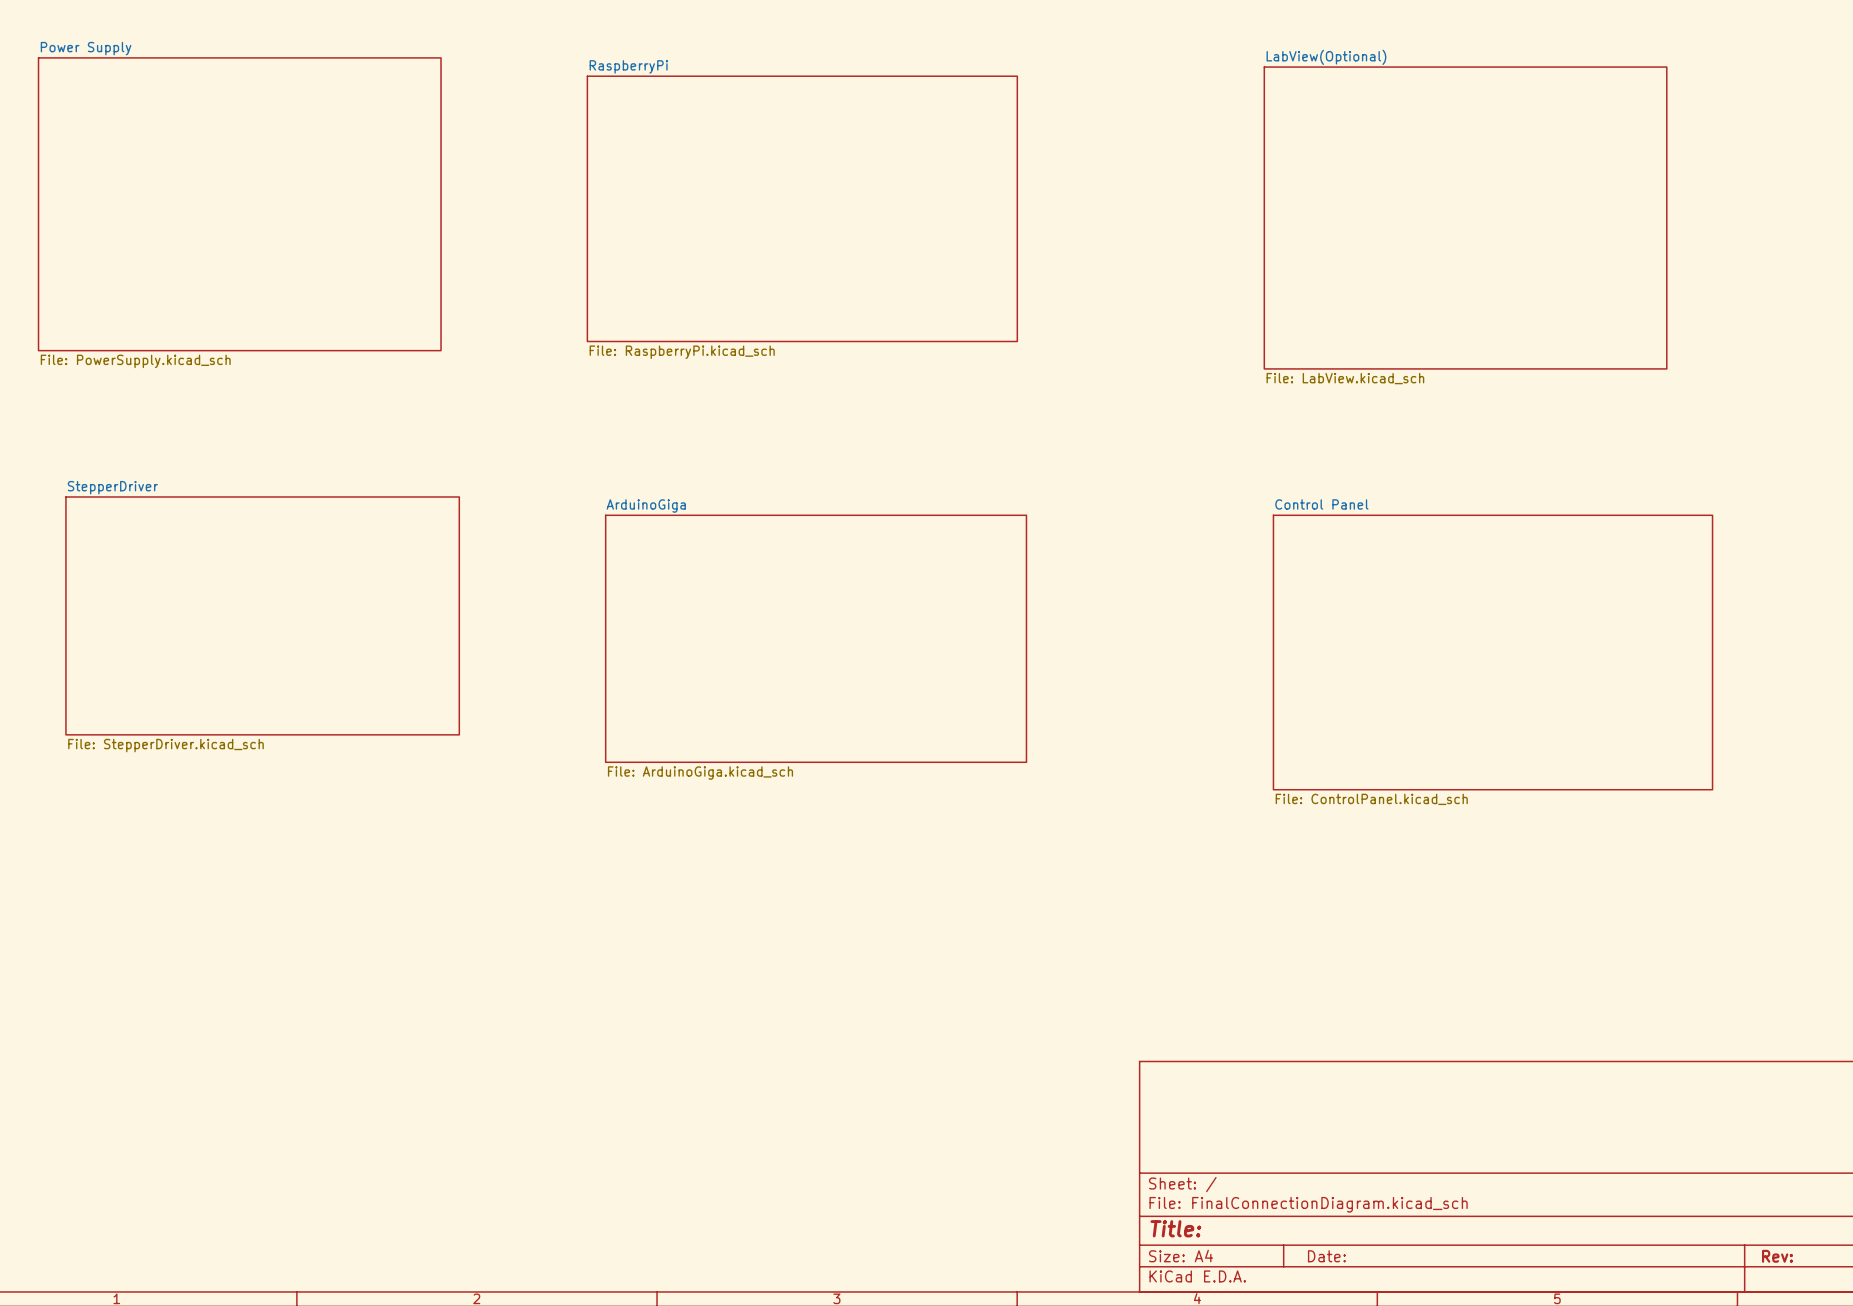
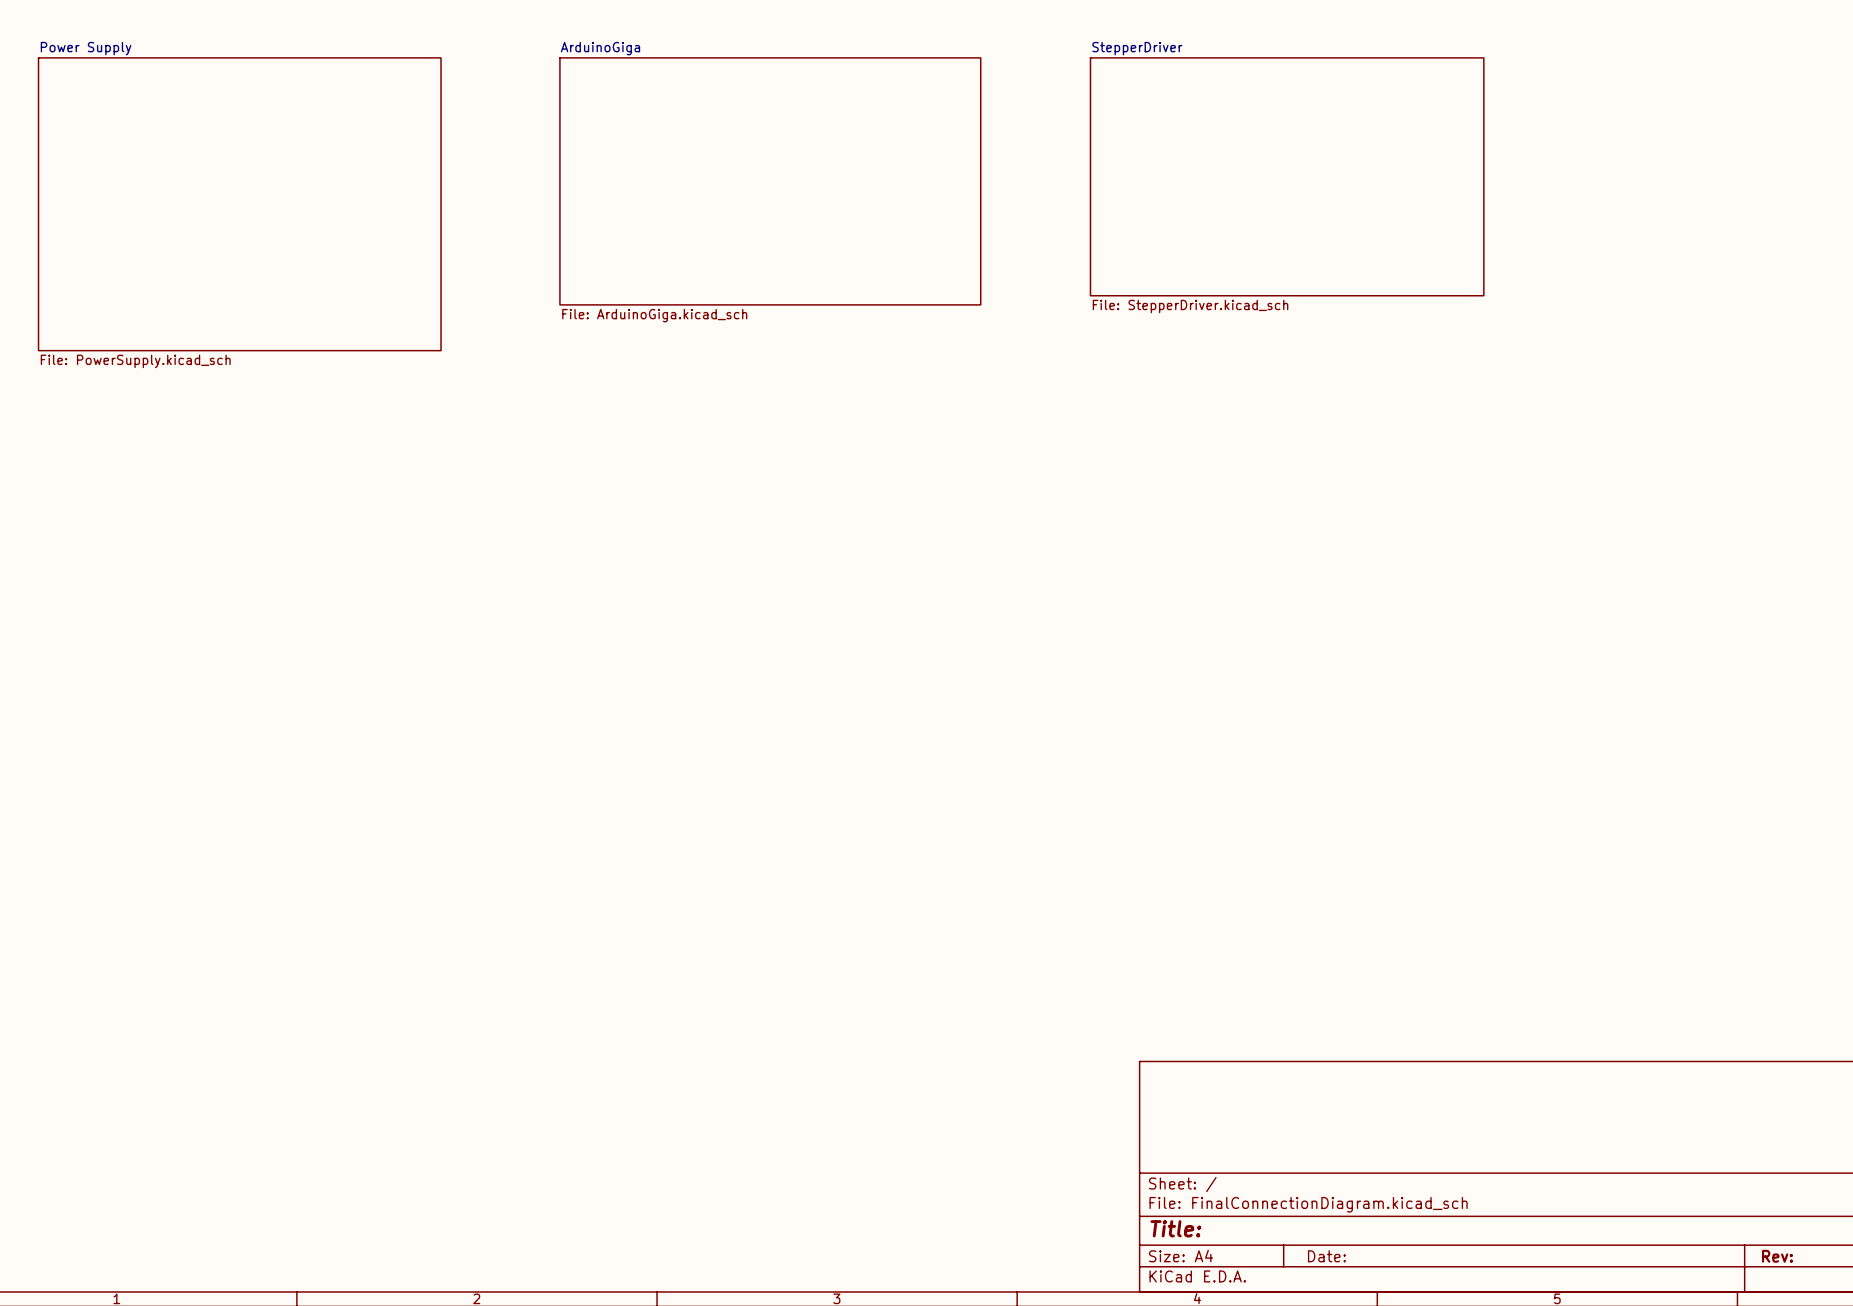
sheet StepperDriver: none -> File: StepperDriver.kicad_sch (1287, 176)
sheet ArduinoGiga: none -> File: ArduinoGiga.kicad_sch (770, 181)
sheet RaspberryPi: File: RaspberryPi.kicad_sch (802, 208) -> none
sheet LabView(Optional): File: LabView.kicad_sch (1465, 217) -> none
sheet StepperDriver: File: StepperDriver.kicad_sch (262, 615) -> none
sheet ArduinoGiga: File: ArduinoGiga.kicad_sch (816, 638) -> none
sheet Control Panel: File: ControlPanel.kicad_sch (1492, 652) -> none

